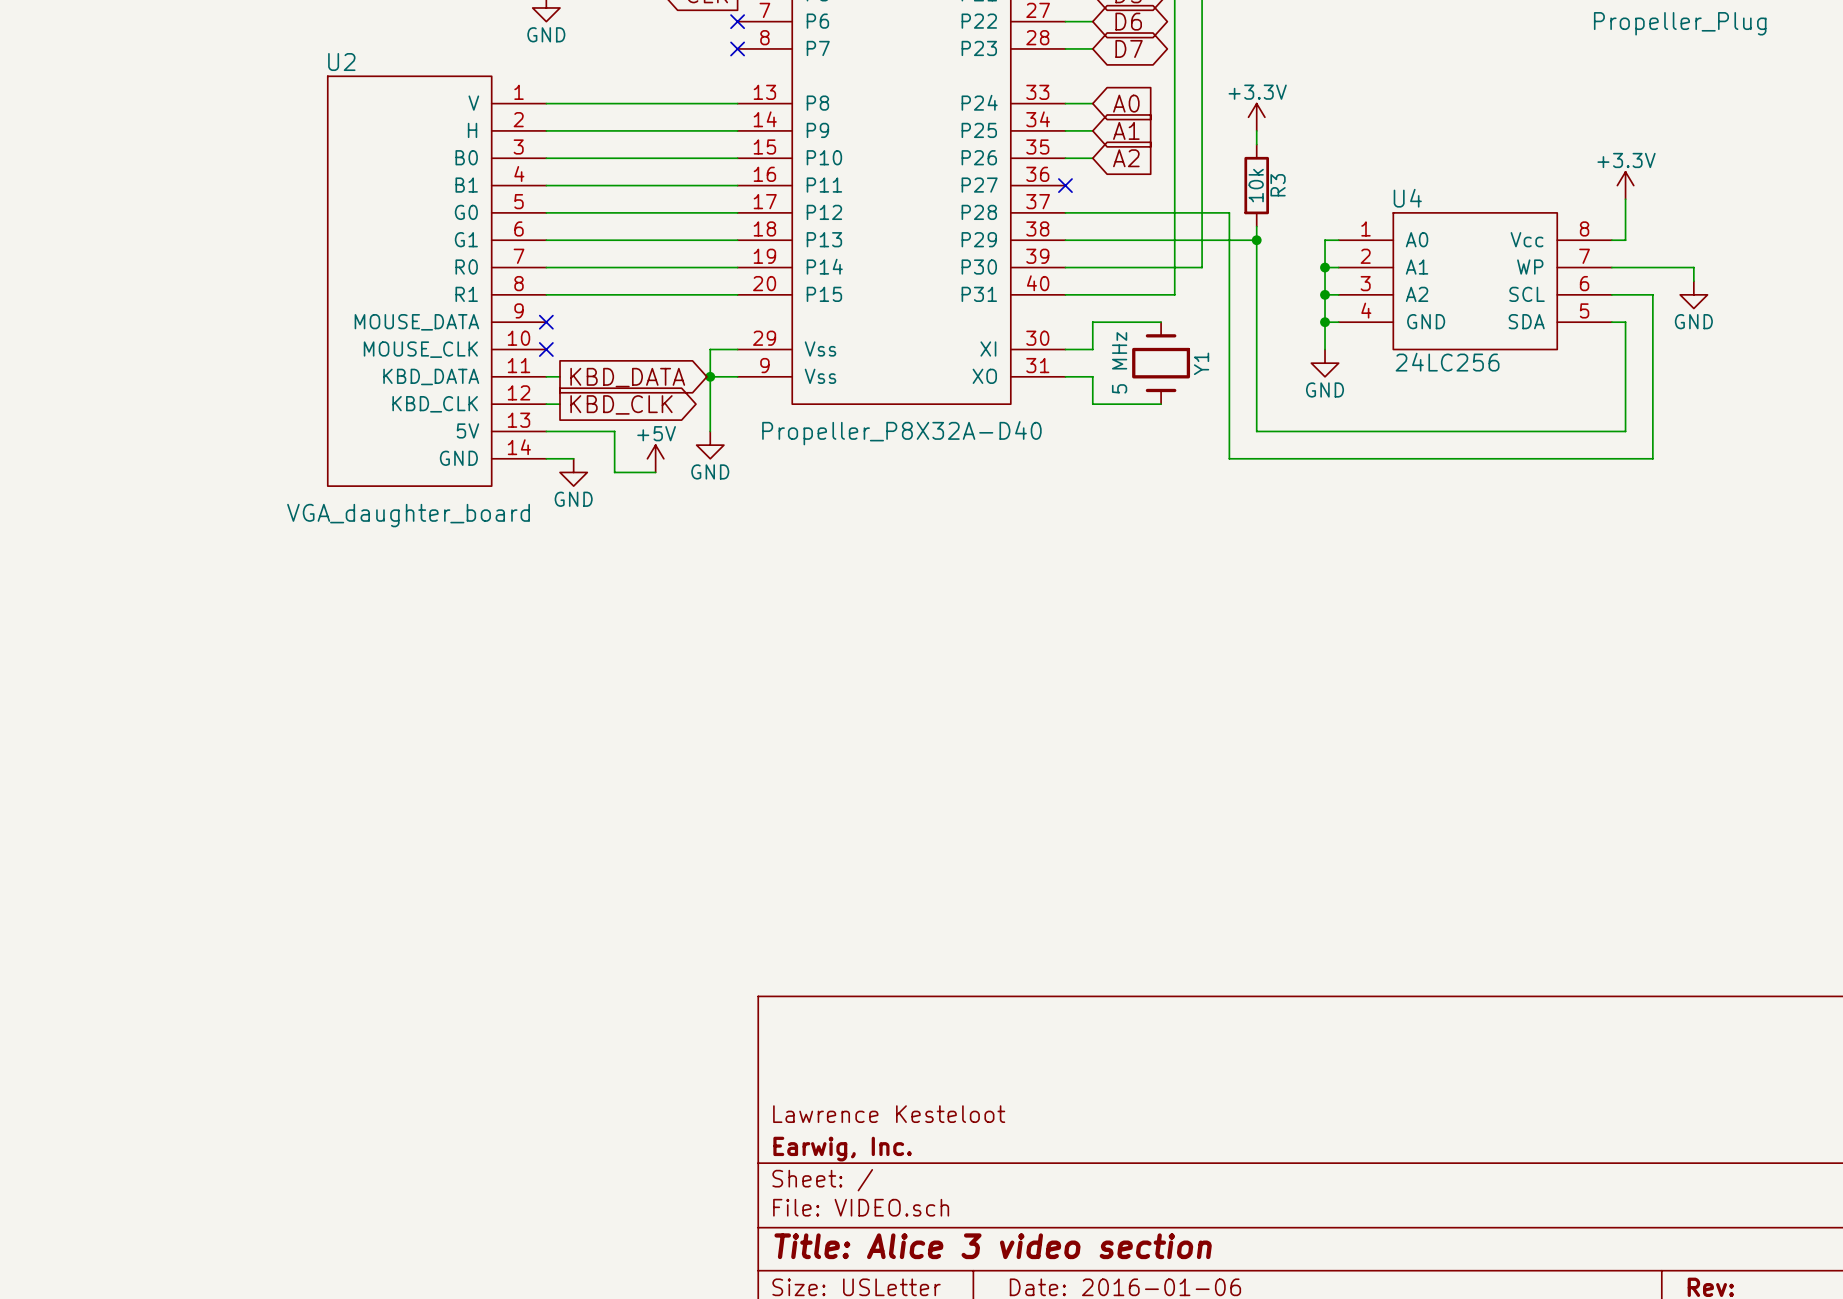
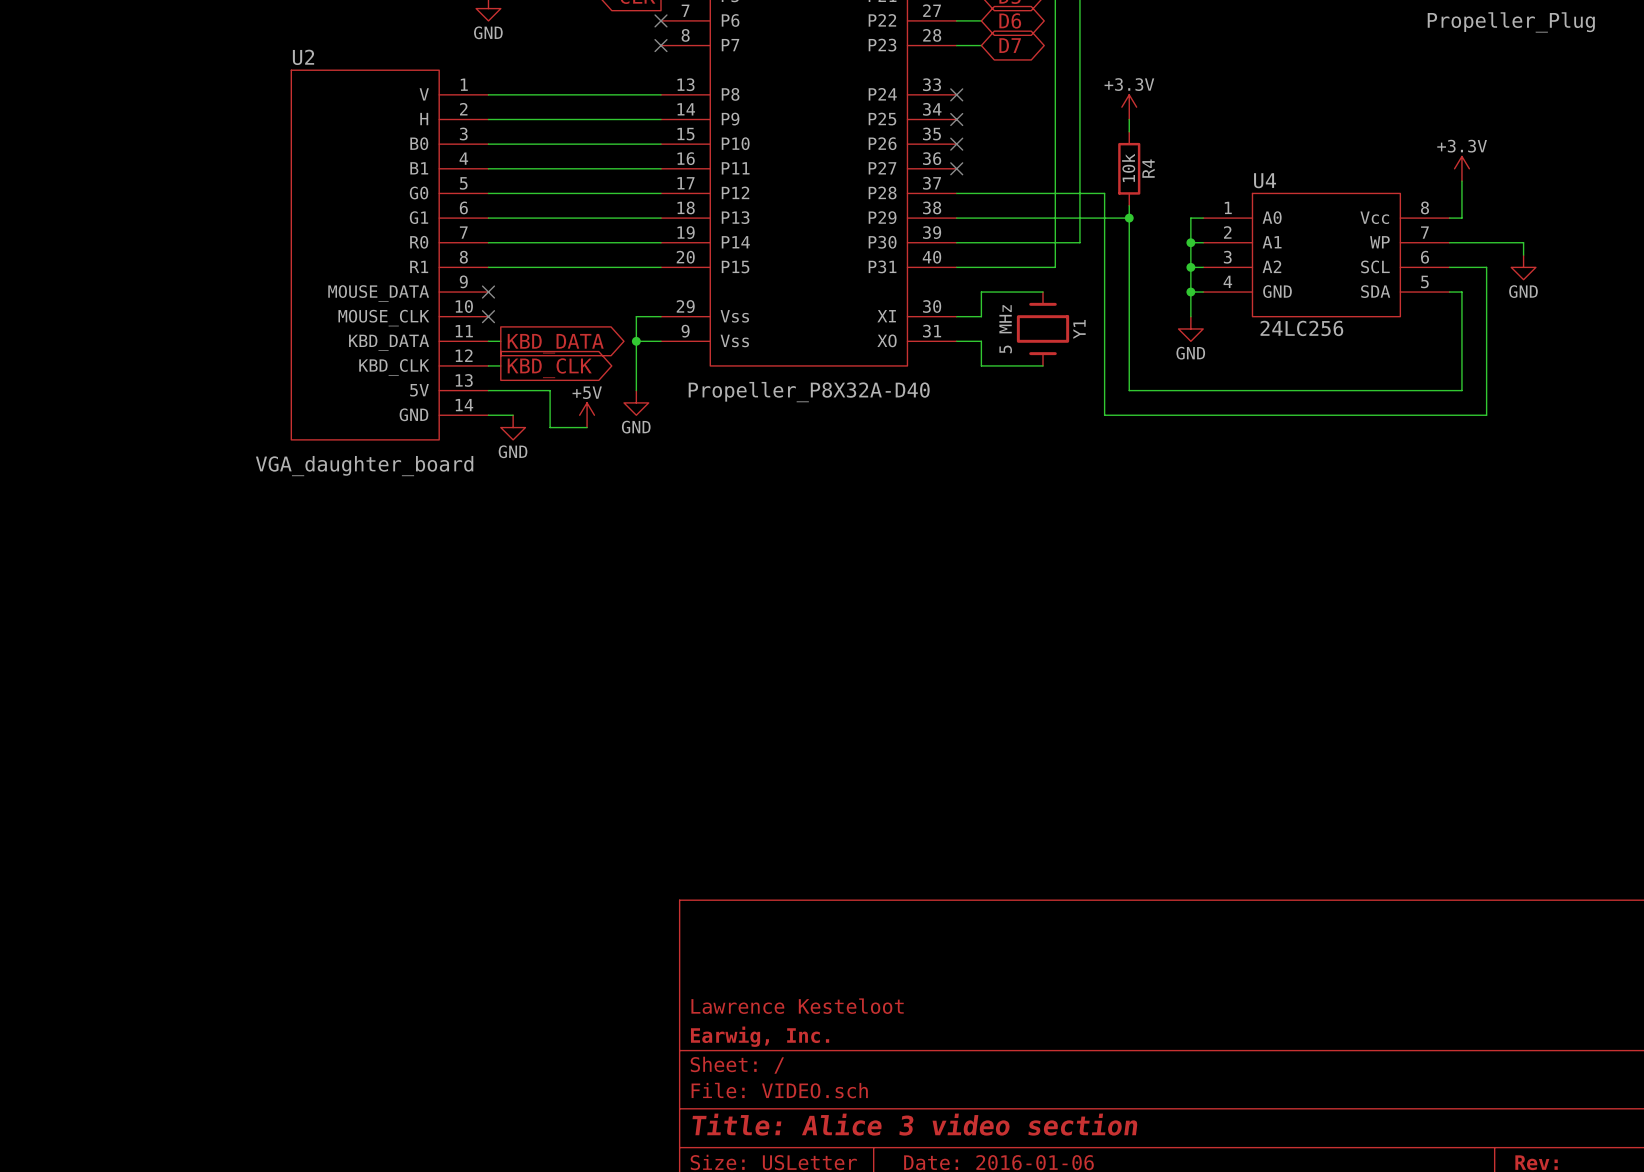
wire: (1065, 103) (1092, 103) -> none
no-connect mark: none -> (956, 94)
global label: A0 (1126, 103) -> none
wire: (1065, 130) (1092, 130) -> none
no-connect mark: none -> (956, 119)
global label: A1 (1126, 130) -> none
wire: (1065, 158) (1092, 158) -> none
no-connect mark: none -> (956, 144)
global label: A2 (1126, 158) -> none
R3 name: R3 (1278, 185) -> R4 (1148, 168)

